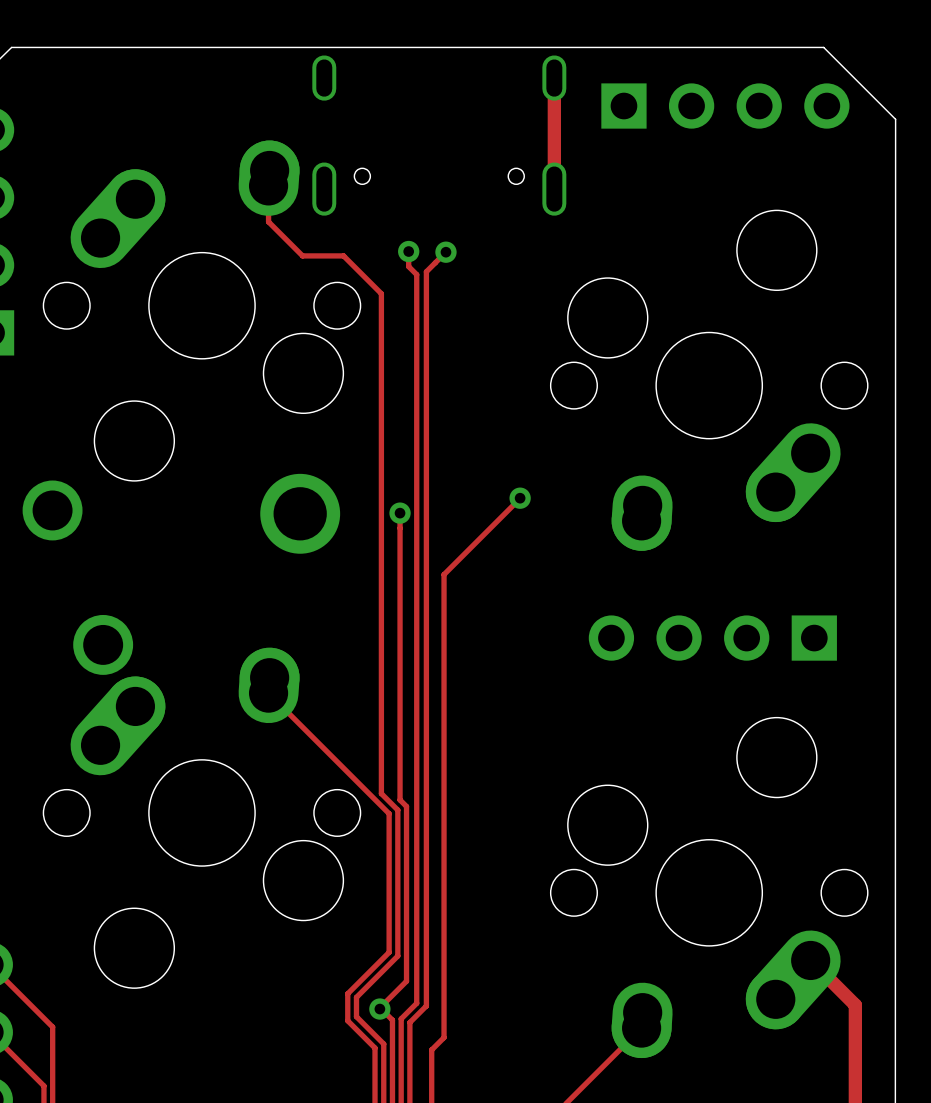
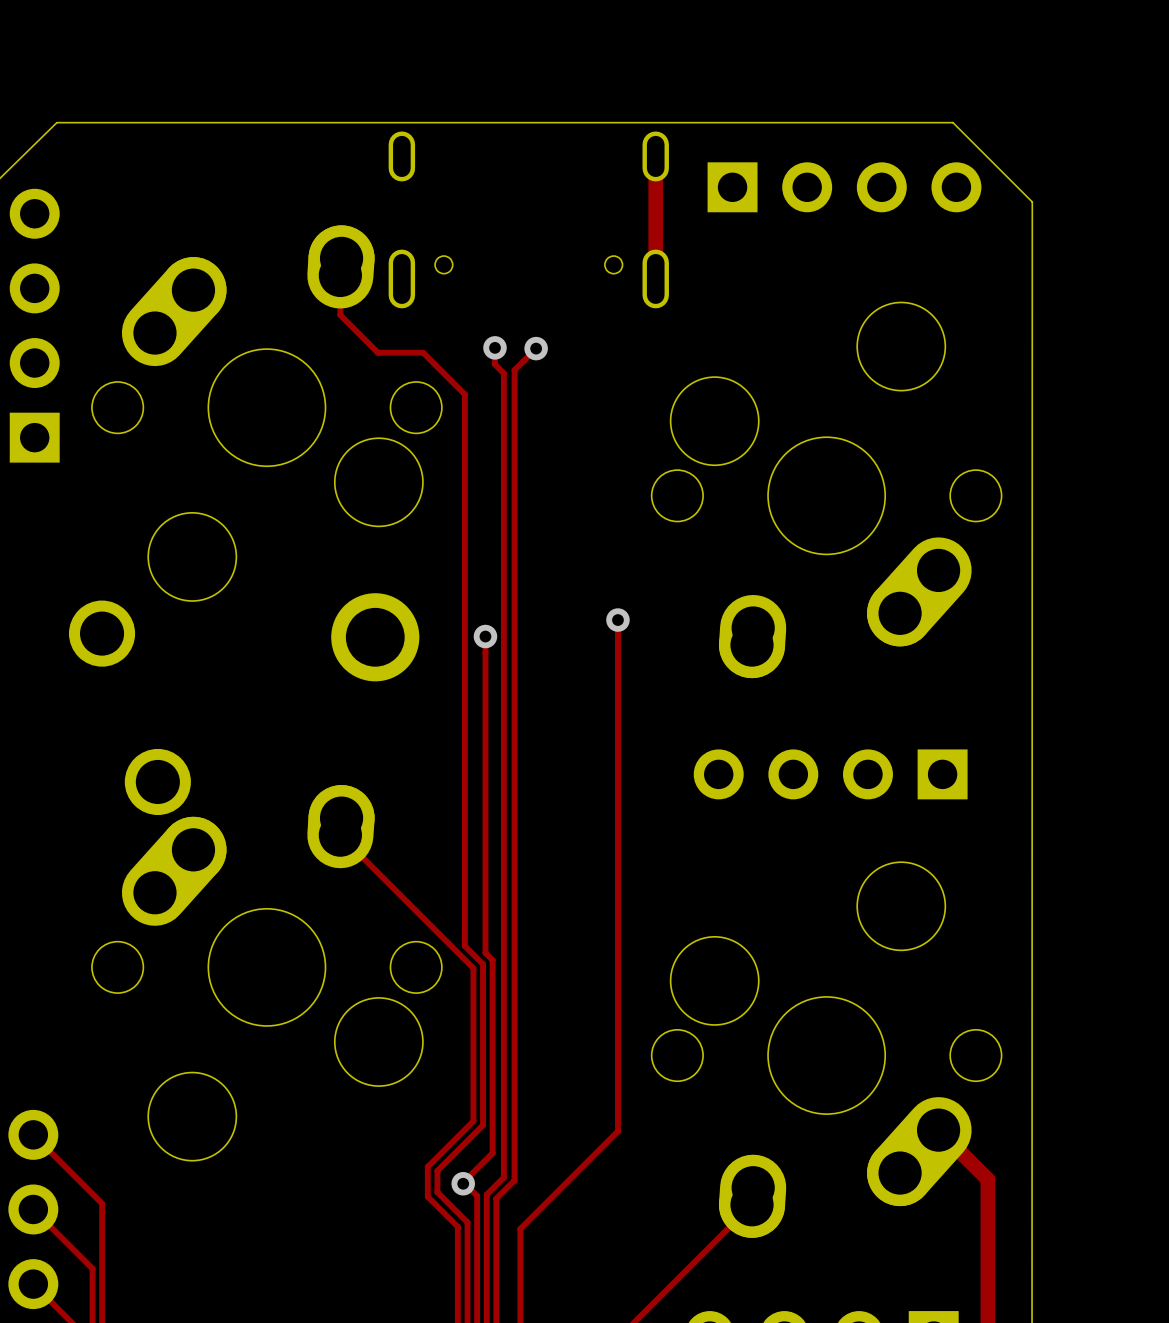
track: (514, 504) (444, 574) (444, 1037) -> (617, 620) (617, 1131) (533, 1215)

